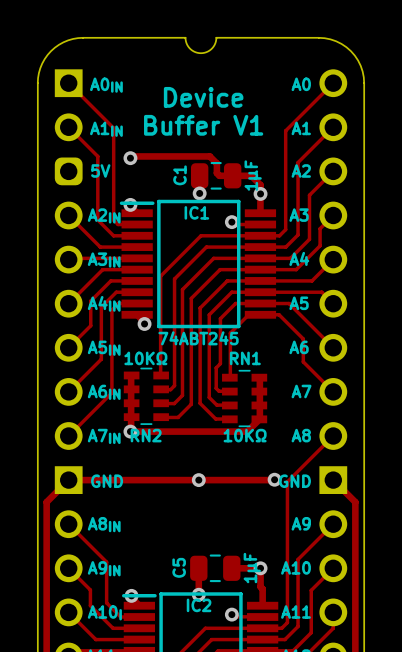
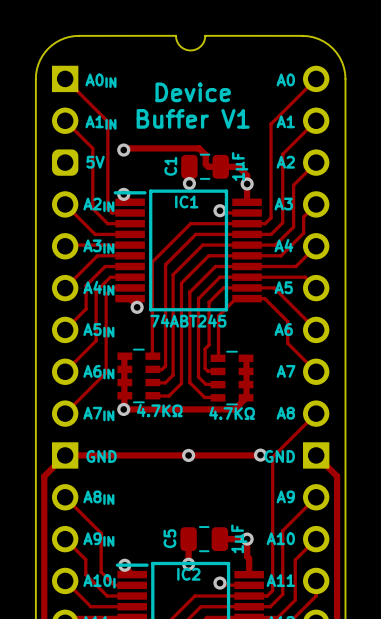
RN2 text: 10KΩ (145, 358) -> none
RN1 name: RN1 (245, 358) -> none
RN2 text: none -> 4.7KΩ (159, 410)
RN2 name: RN2 (146, 435) -> none
RN1 text: none -> 4.7KΩ (232, 413)
RN1 text: 10KΩ (245, 435) -> none

